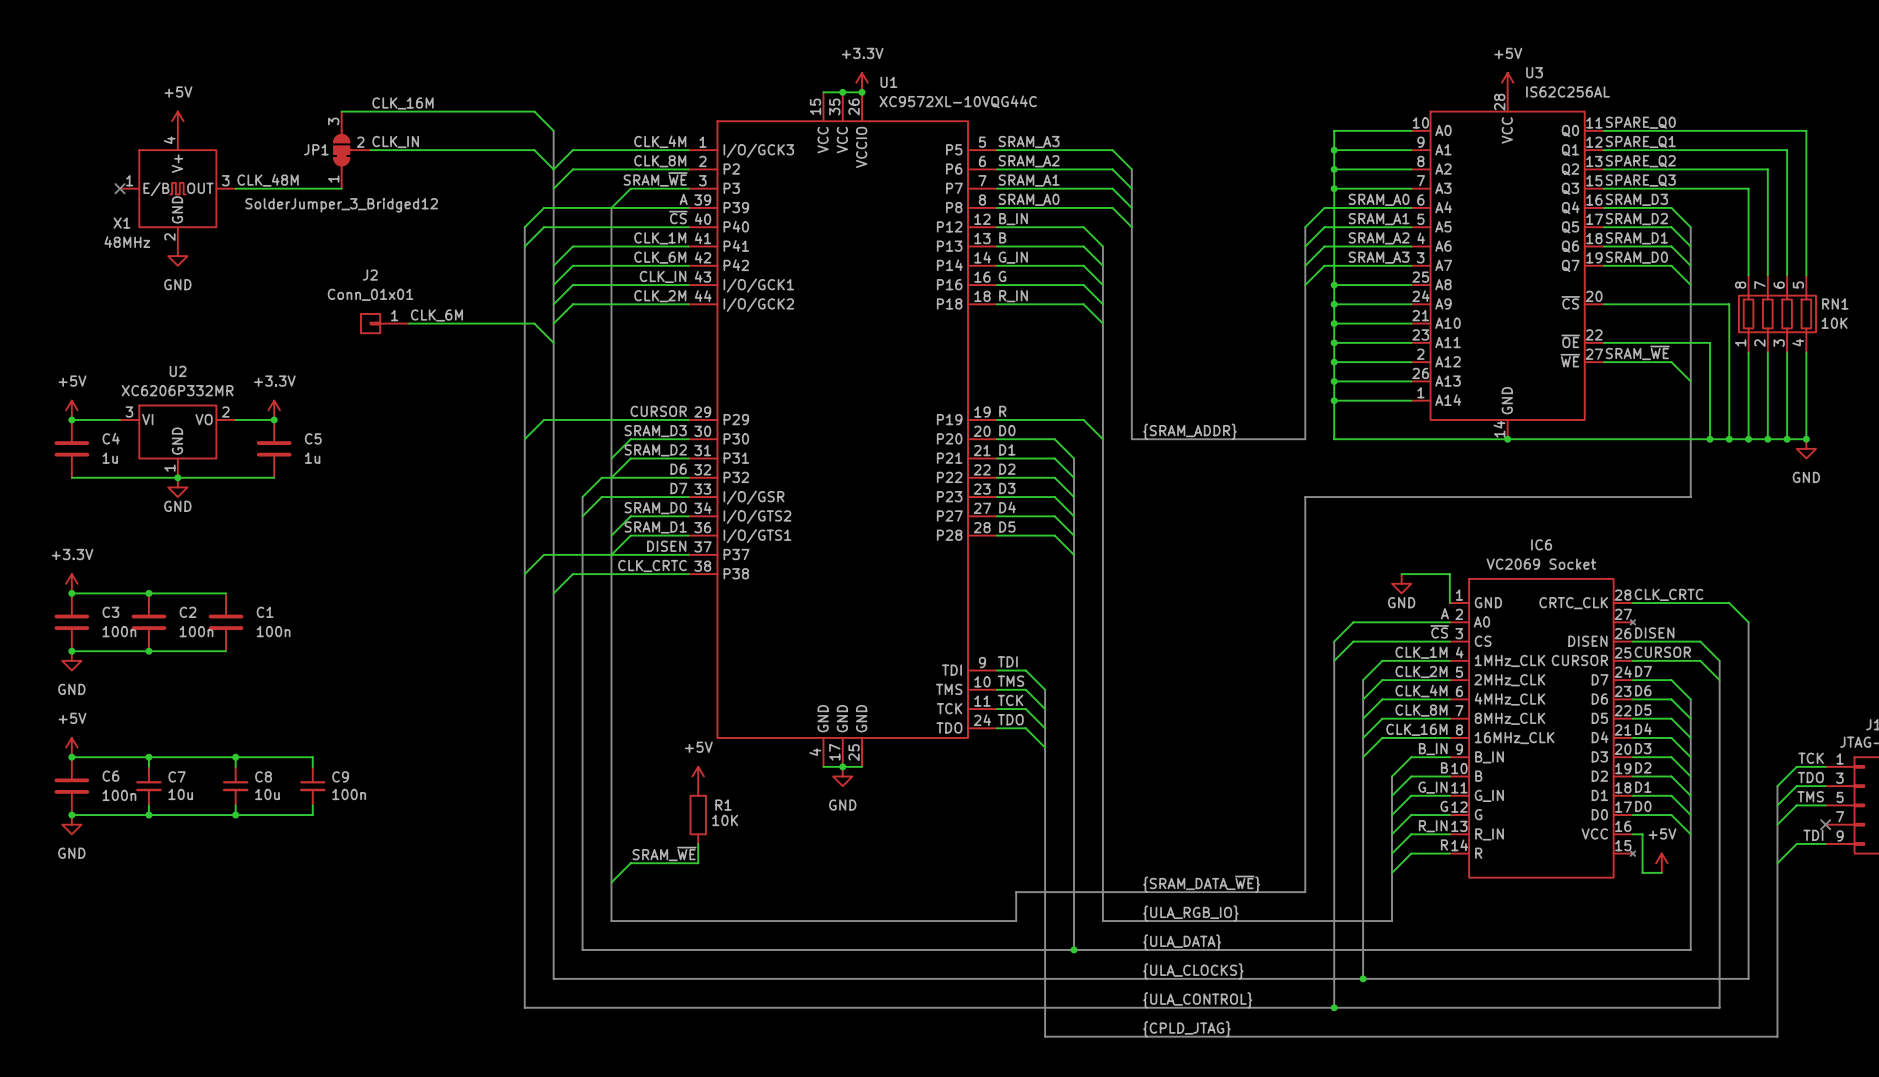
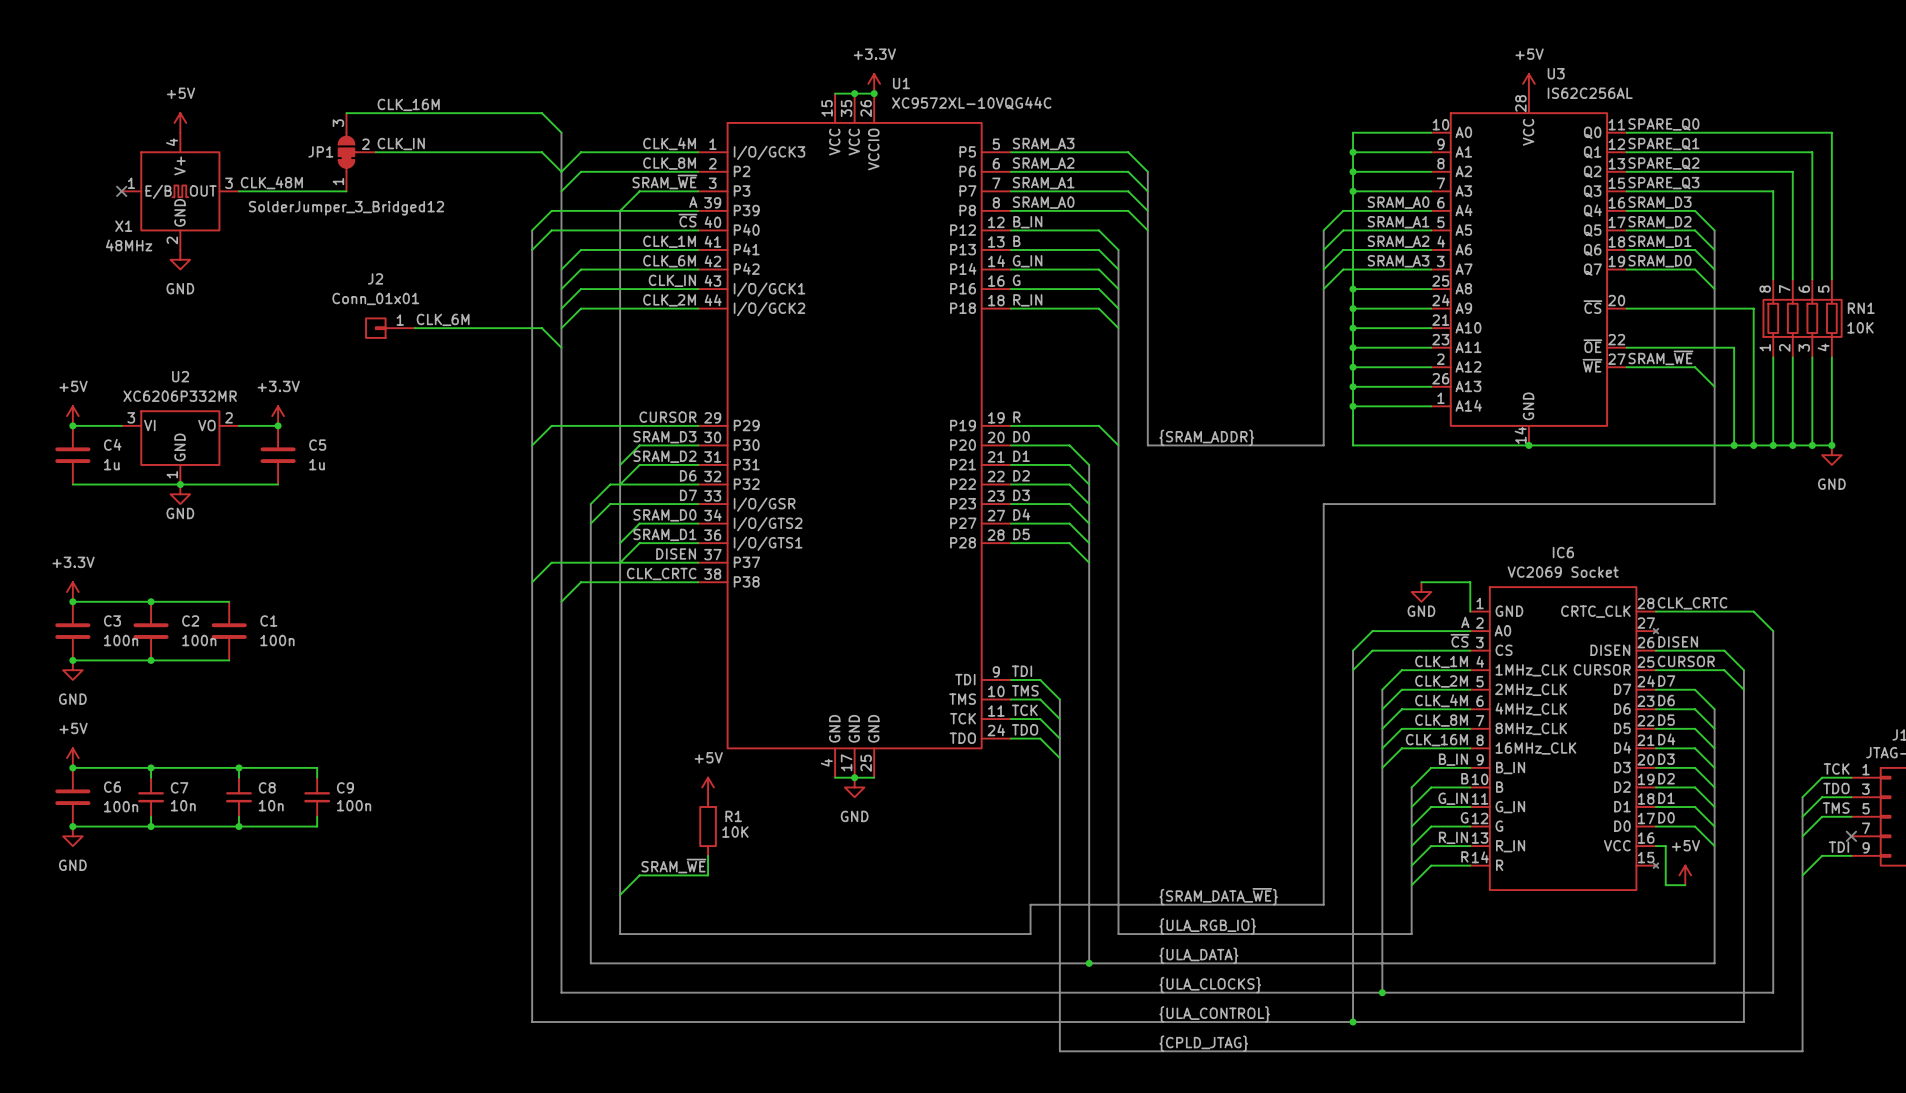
C7 value: 10u (180, 794) -> 10n (183, 805)
C8 value: 10u (267, 794) -> 10n (271, 805)

